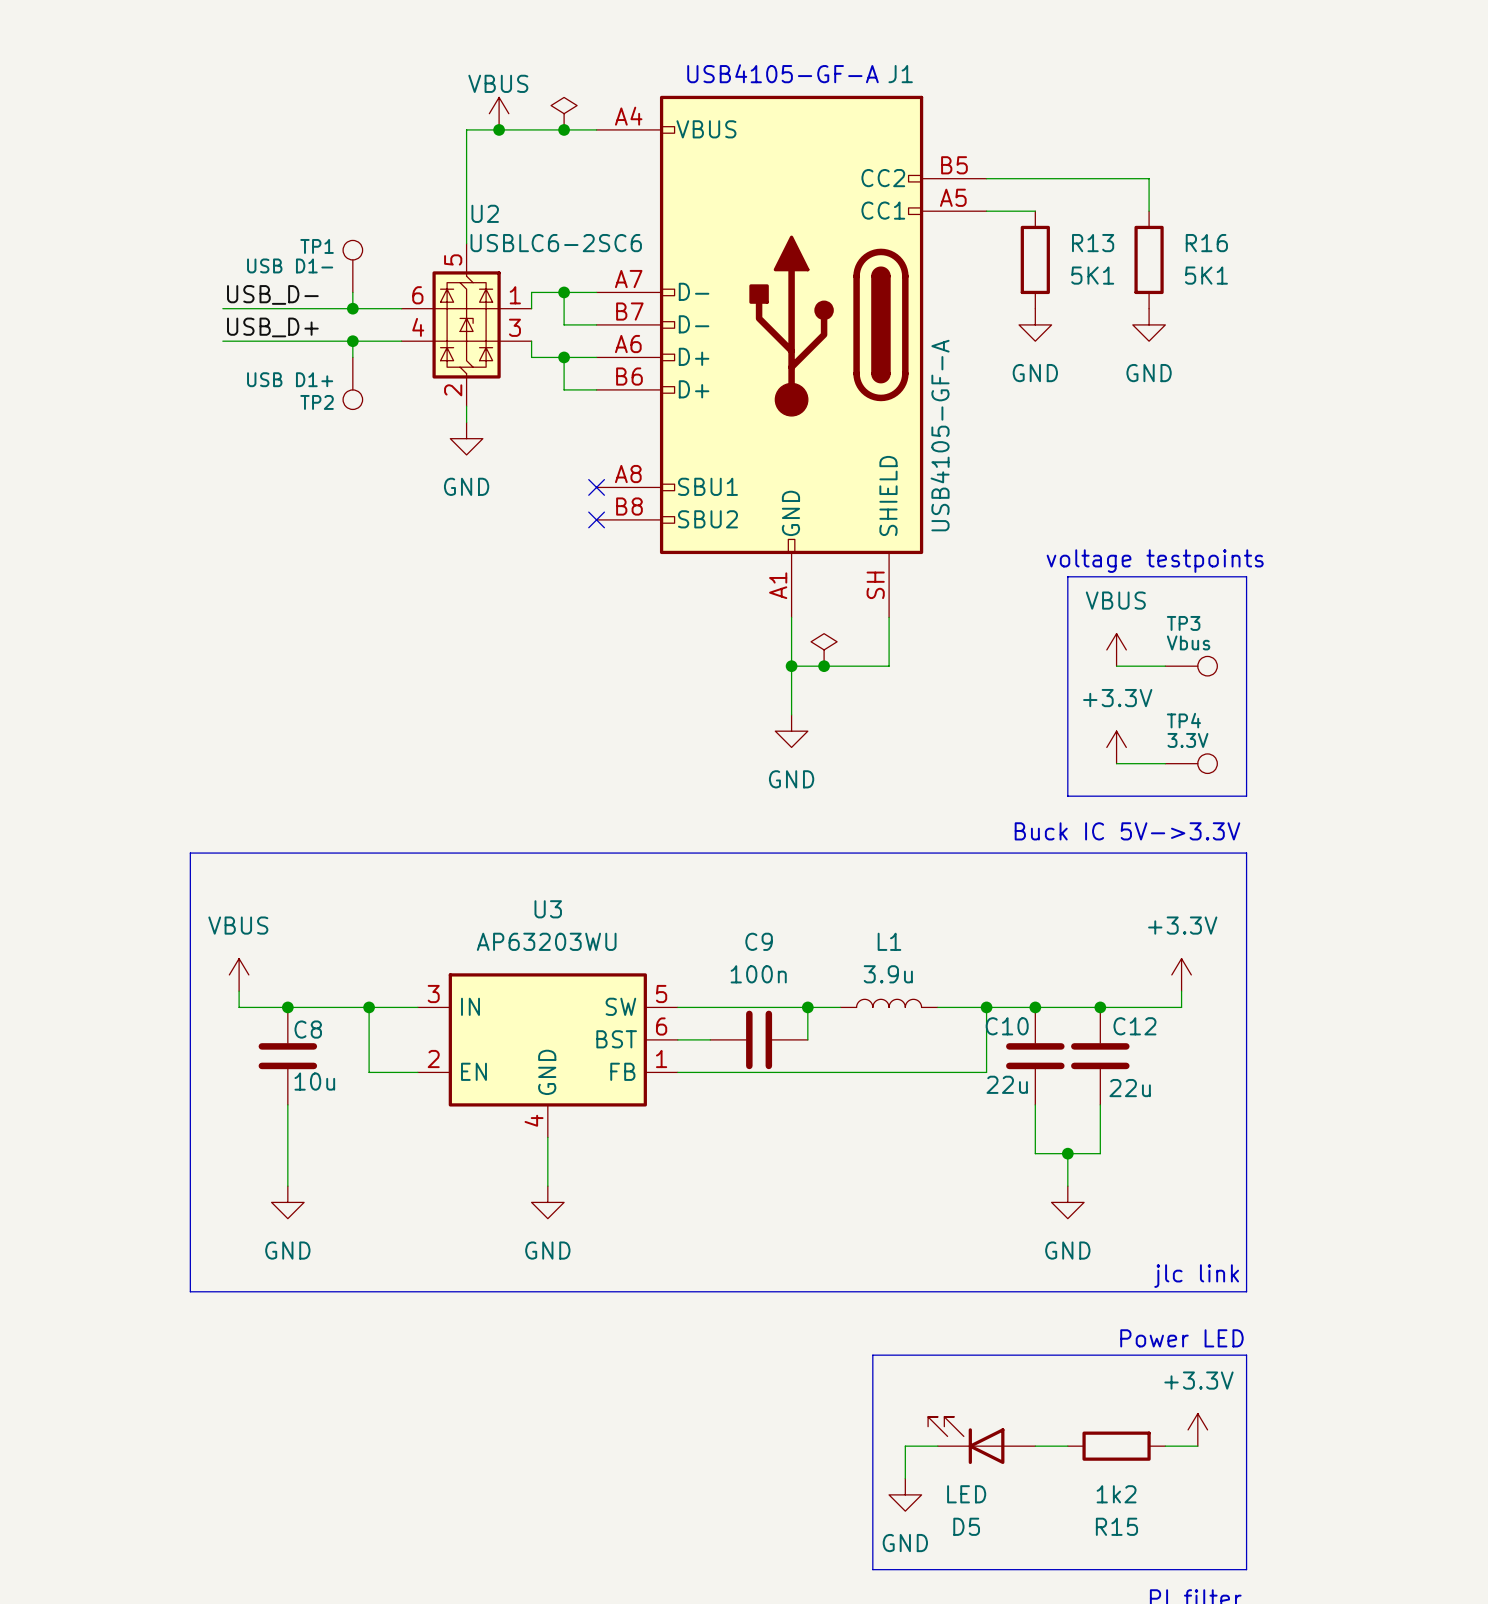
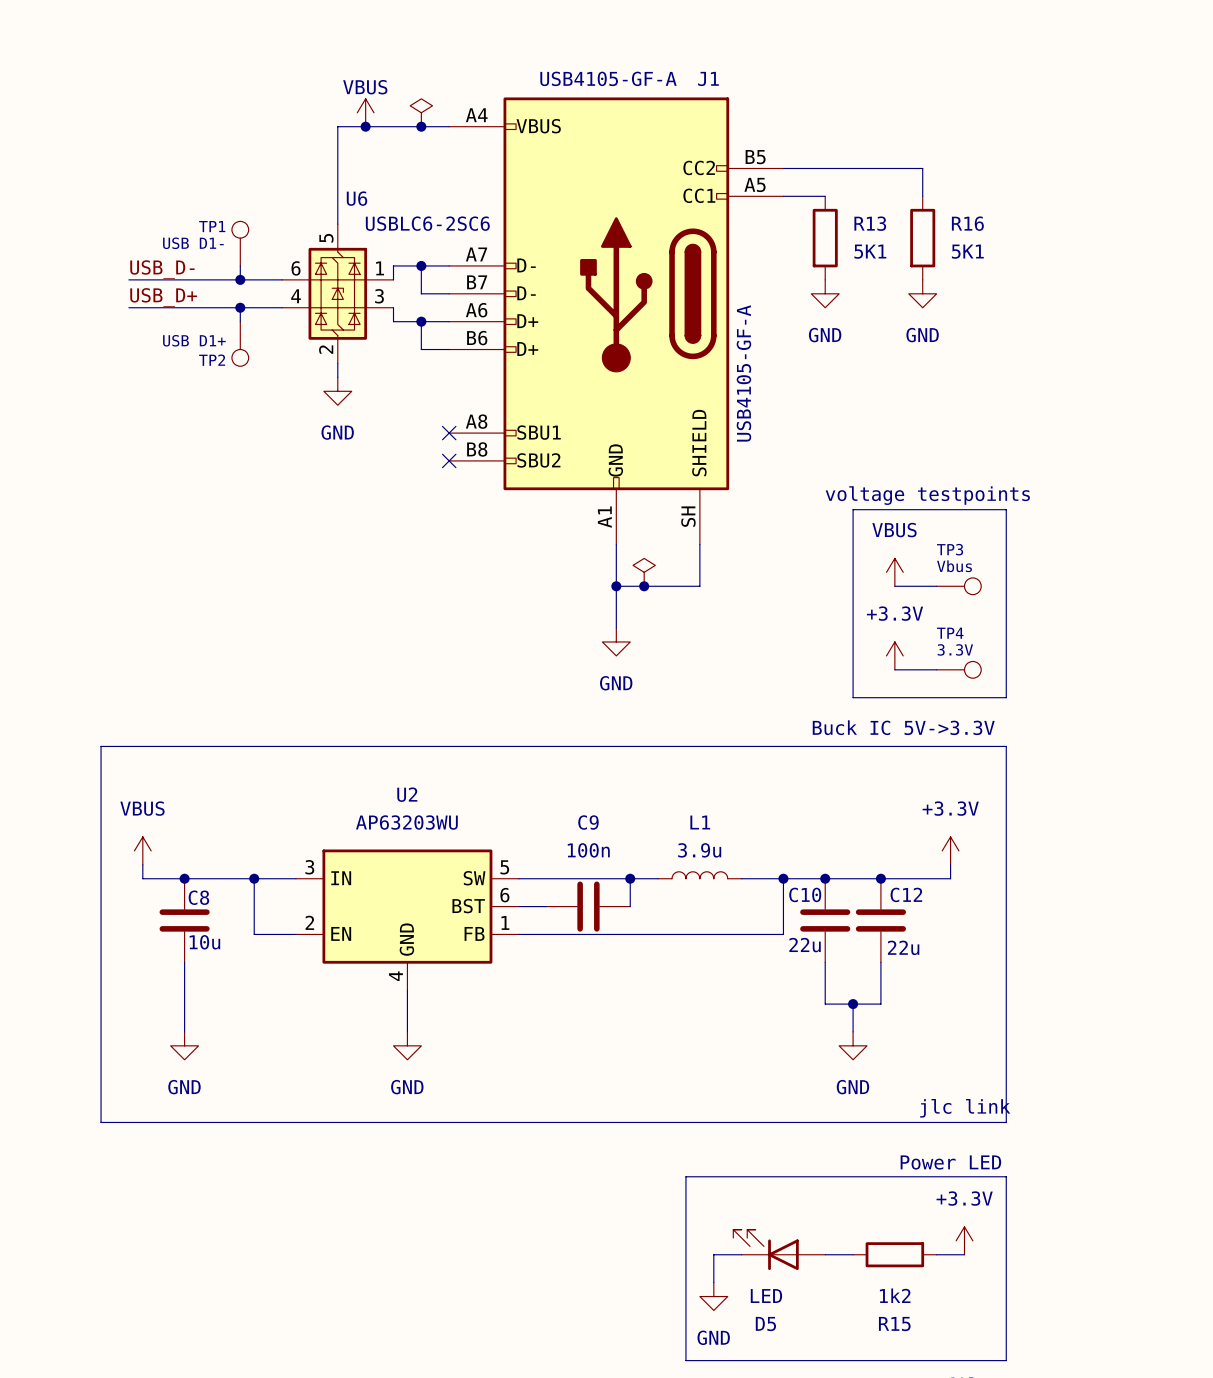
U2 name: U2 (485, 213) -> U6 (356, 198)
U3 name: U3 (548, 909) -> U2 (407, 794)

